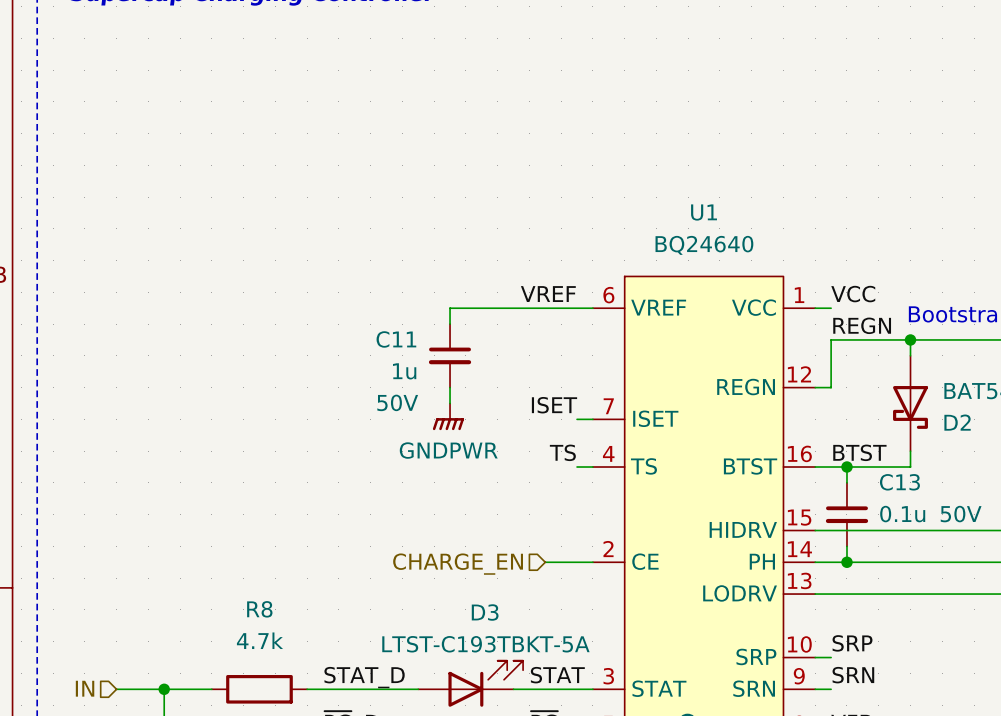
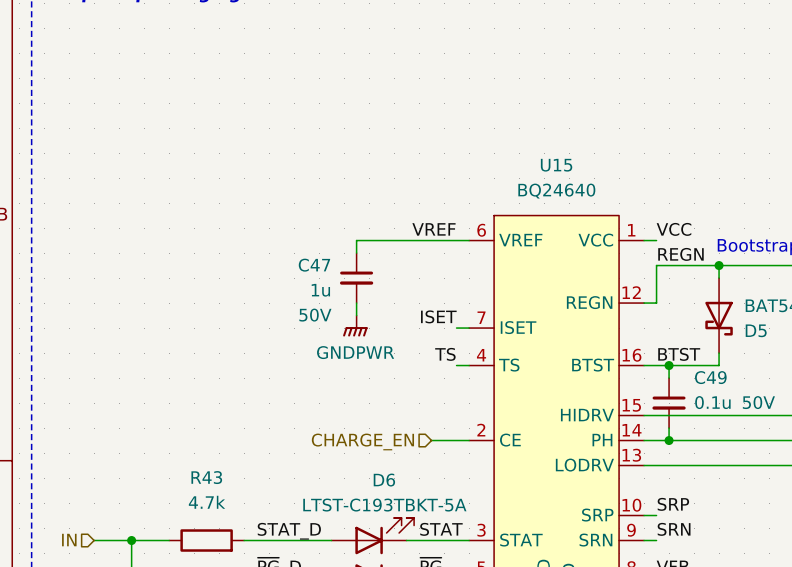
U1 name: U1 (704, 212) -> U15 (556, 165)
C11 name: C11 (396, 339) -> C47 (314, 265)
D2 name: D2 (957, 422) -> D5 (756, 330)
C13 name: C13 (899, 482) -> C49 (710, 377)
R8 name: R8 (259, 609) -> R43 (206, 477)
D3 name: D3 (485, 612) -> D6 (384, 480)

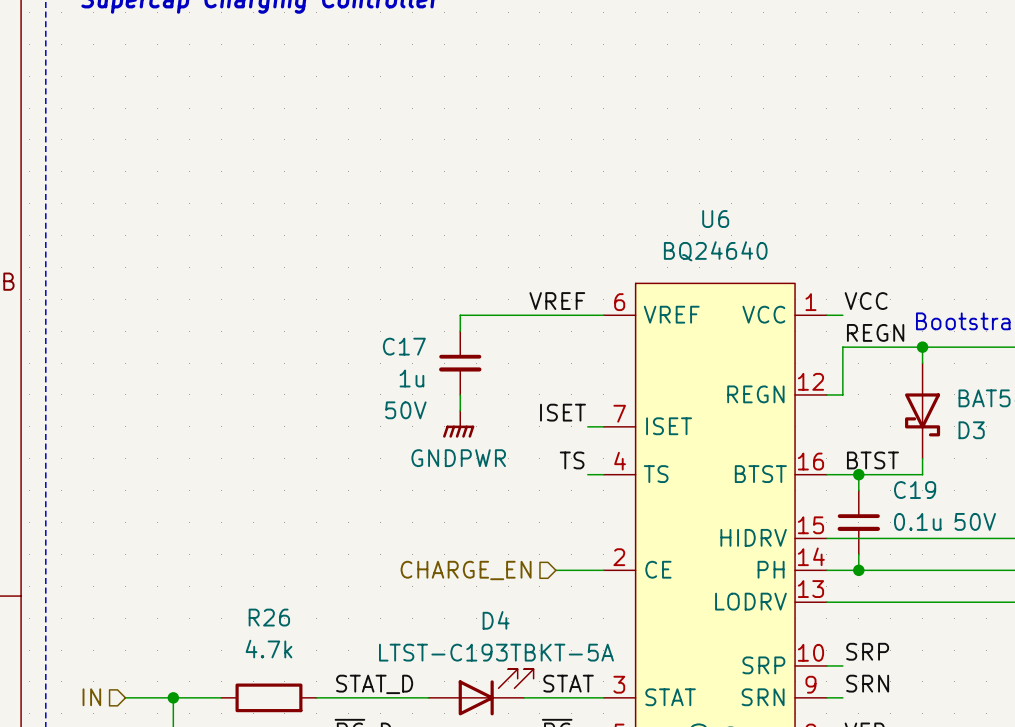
U15 name: U15 (556, 165) -> U6 (715, 219)
C47 name: C47 (314, 265) -> C17 (404, 346)
D5 name: D5 (756, 330) -> D3 (971, 430)
C49 name: C49 (710, 377) -> C19 (915, 490)
R43 name: R43 (206, 477) -> R26 (269, 617)
D6 name: D6 (384, 480) -> D4 (496, 620)

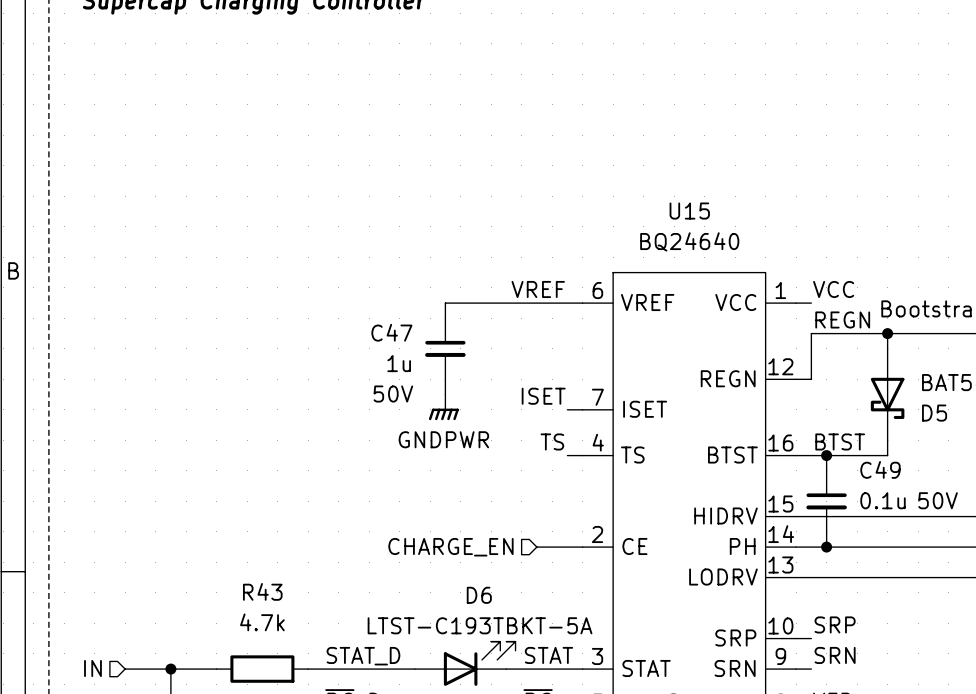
U6 name: U6 (715, 219) -> U15 (689, 211)
C17 name: C17 (404, 346) -> C47 (391, 332)
D3 name: D3 (971, 430) -> D5 (934, 413)
C19 name: C19 (915, 490) -> C49 (880, 469)
R26 name: R26 (269, 617) -> R43 (262, 591)
D4 name: D4 (496, 620) -> D6 (479, 595)

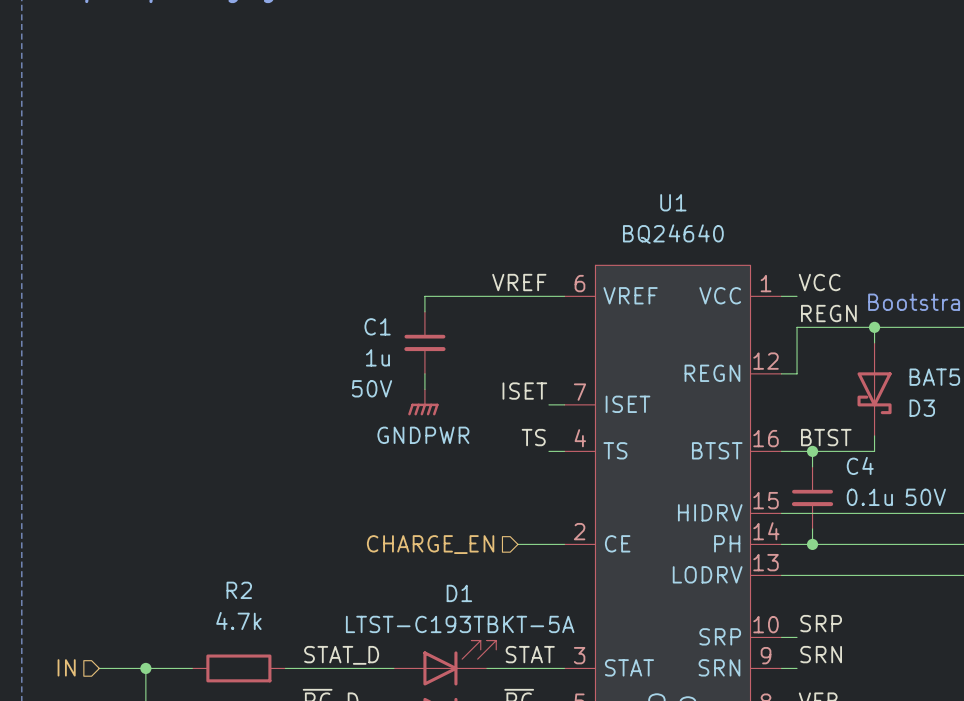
U15 name: U15 (689, 211) -> U1 (673, 202)
C47 name: C47 (391, 332) -> C1 (377, 326)
D5 name: D5 (934, 413) -> D3 (922, 408)
C49 name: C49 (880, 469) -> C4 (860, 465)
R43 name: R43 (262, 591) -> R2 (239, 590)
D6 name: D6 (479, 595) -> D1 (459, 593)

